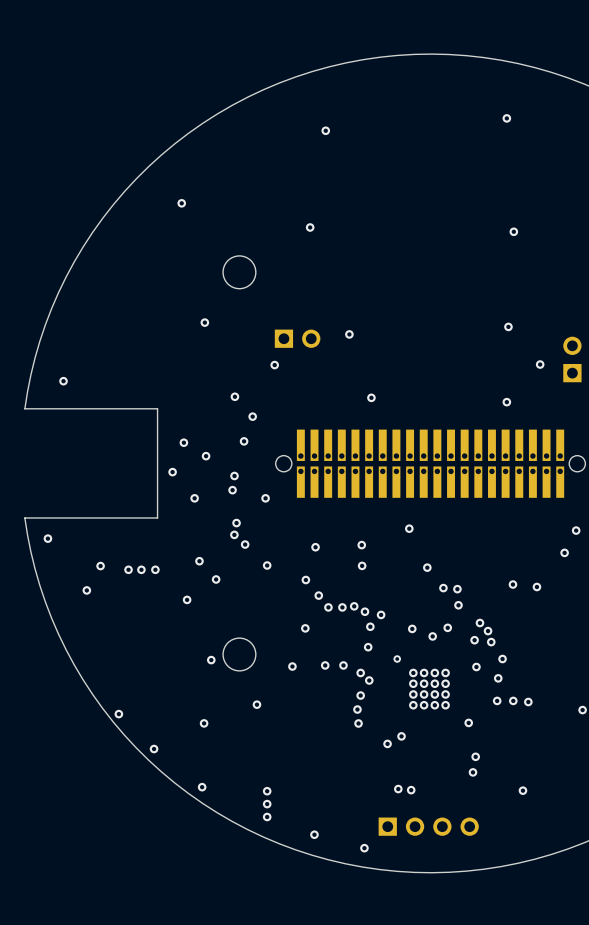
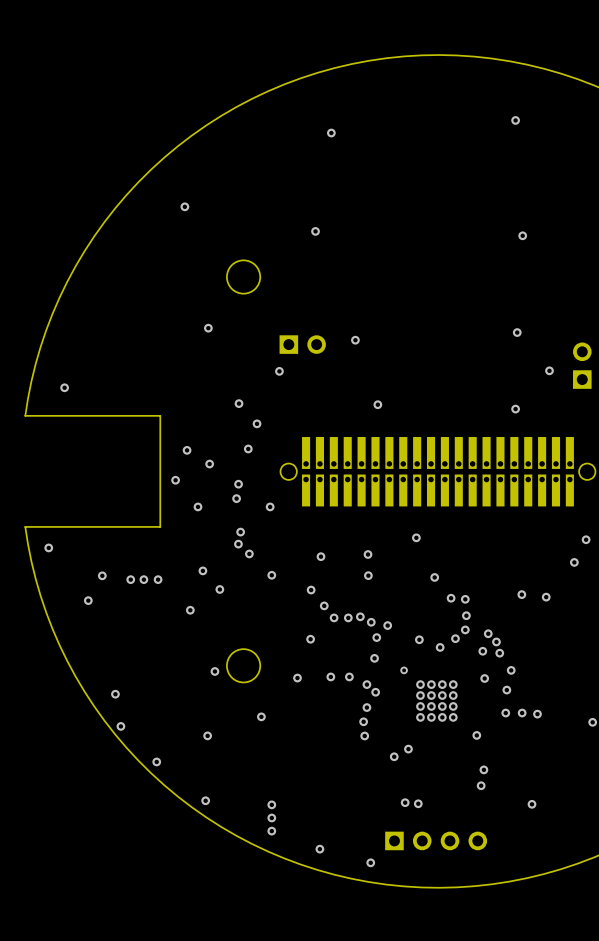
via: none -> (465, 629)
via: none -> (115, 694)

